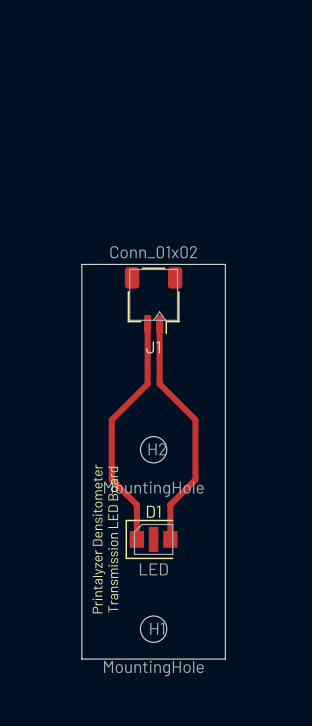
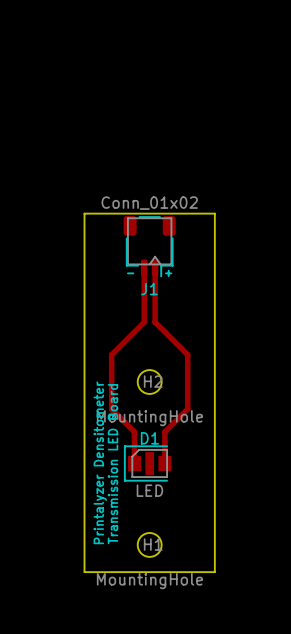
line: none -> (168, 270) (168, 276)
line: none -> (127, 273) (133, 273)
line: none -> (165, 273) (171, 273)

